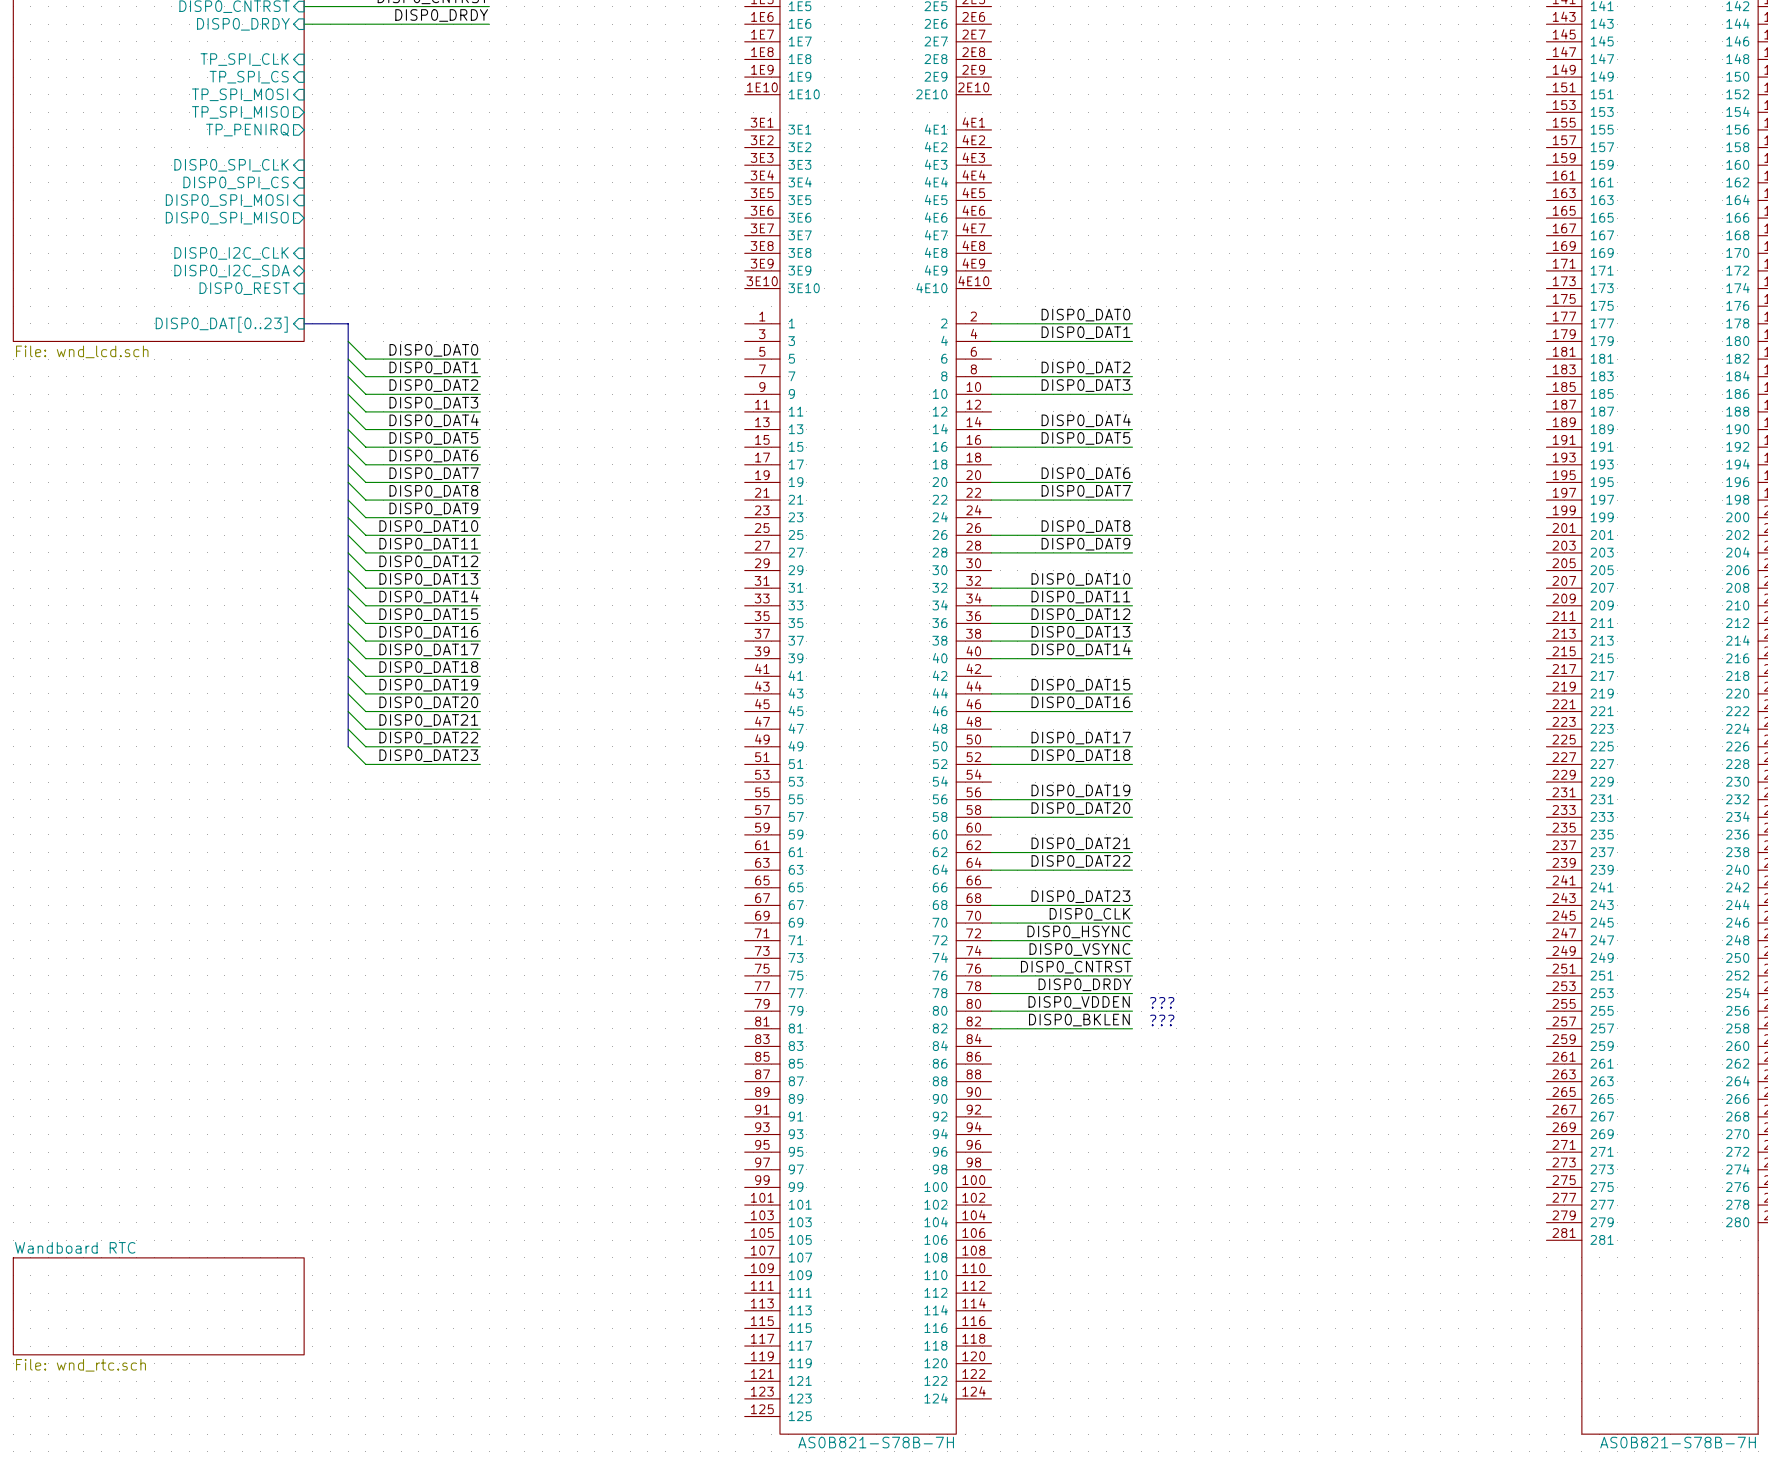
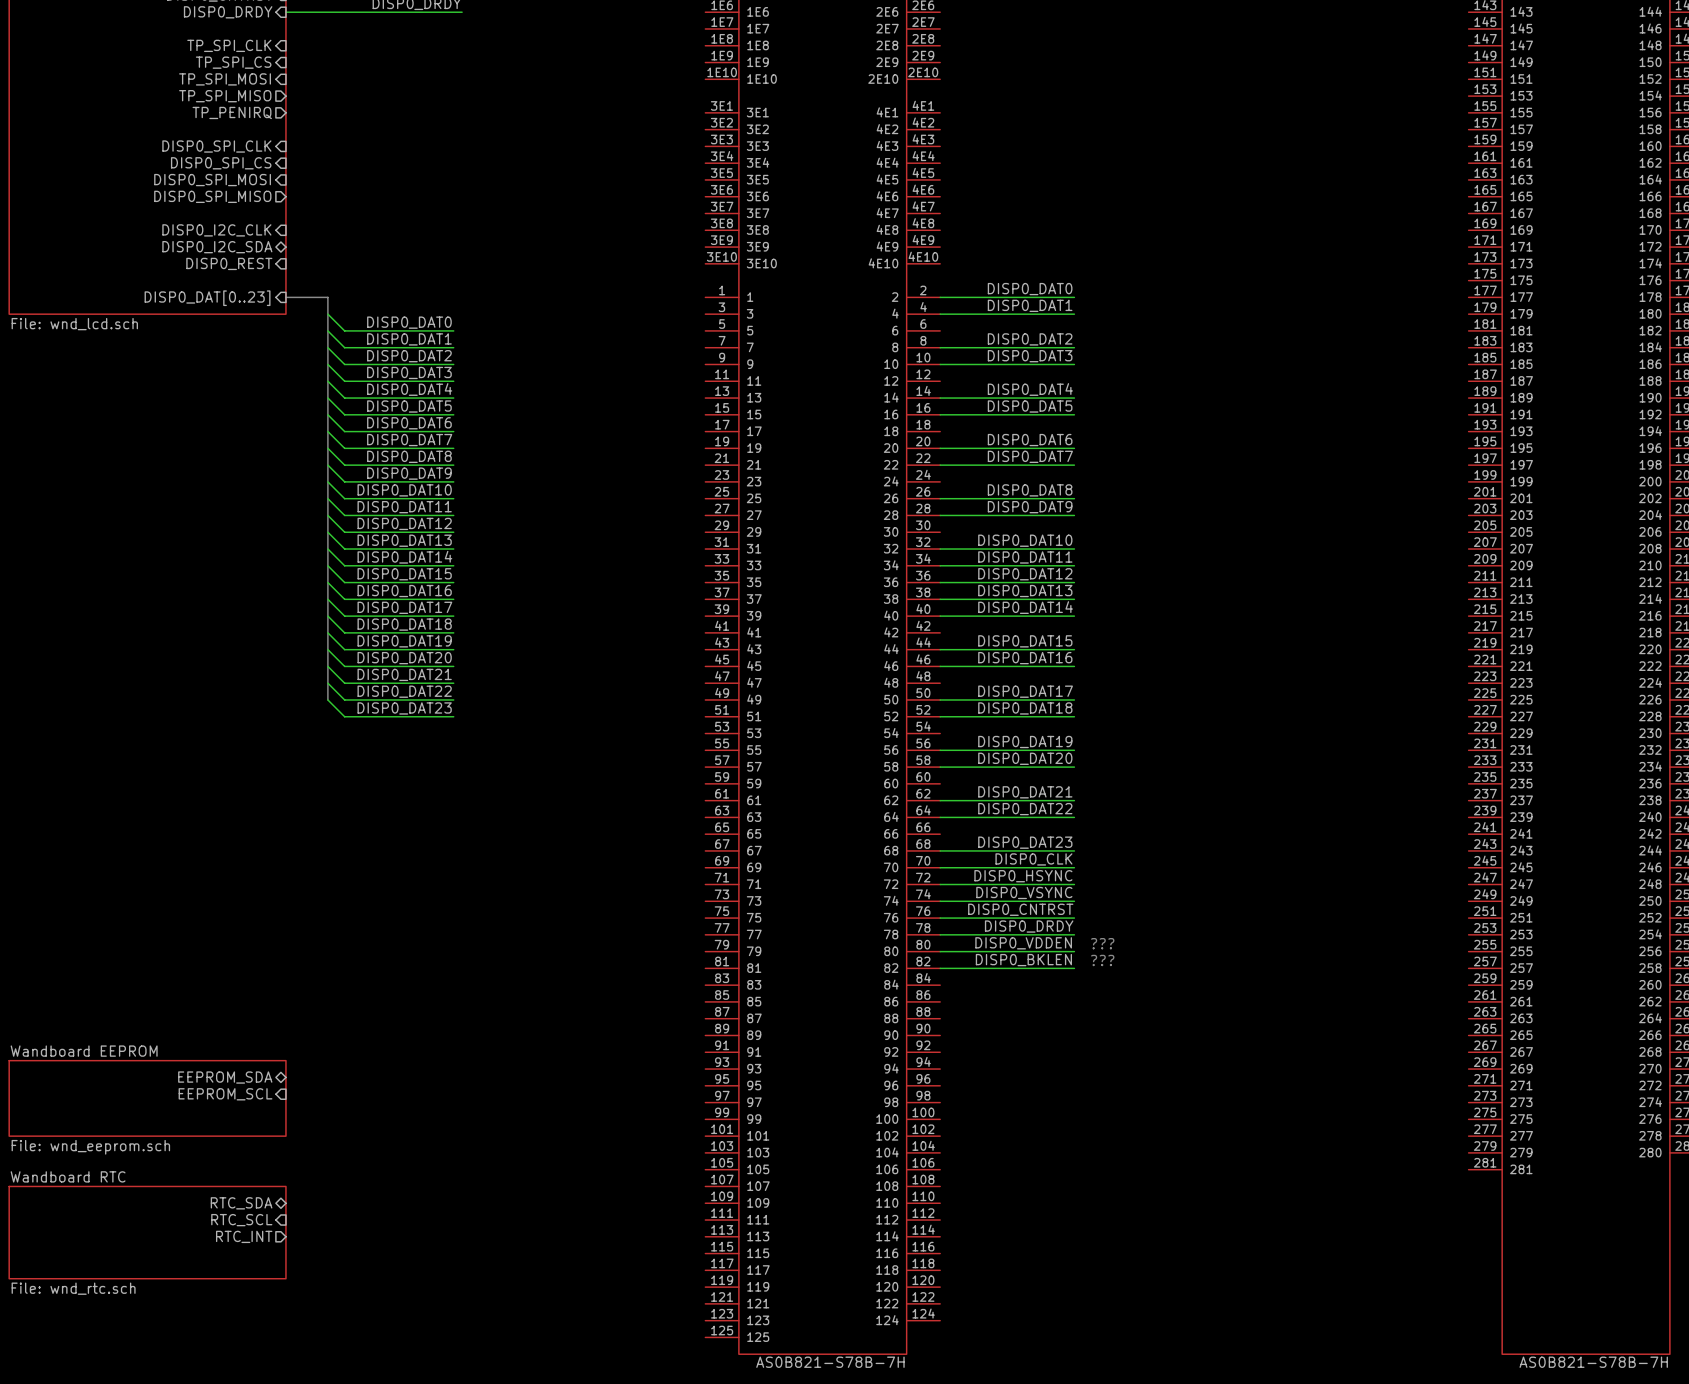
sheet pin: none -> EEPROM_SDA (225, 1077)
sheet pin: none -> EEPROM_SCL (225, 1094)
sheet Wandboard EEPROM: none -> File: wnd_eeprom.sch (147, 1098)
sheet pin: none -> RTC_SDA (241, 1203)
sheet pin: none -> RTC_SCL (241, 1220)
sheet pin: none -> RTC_INT (244, 1236)

